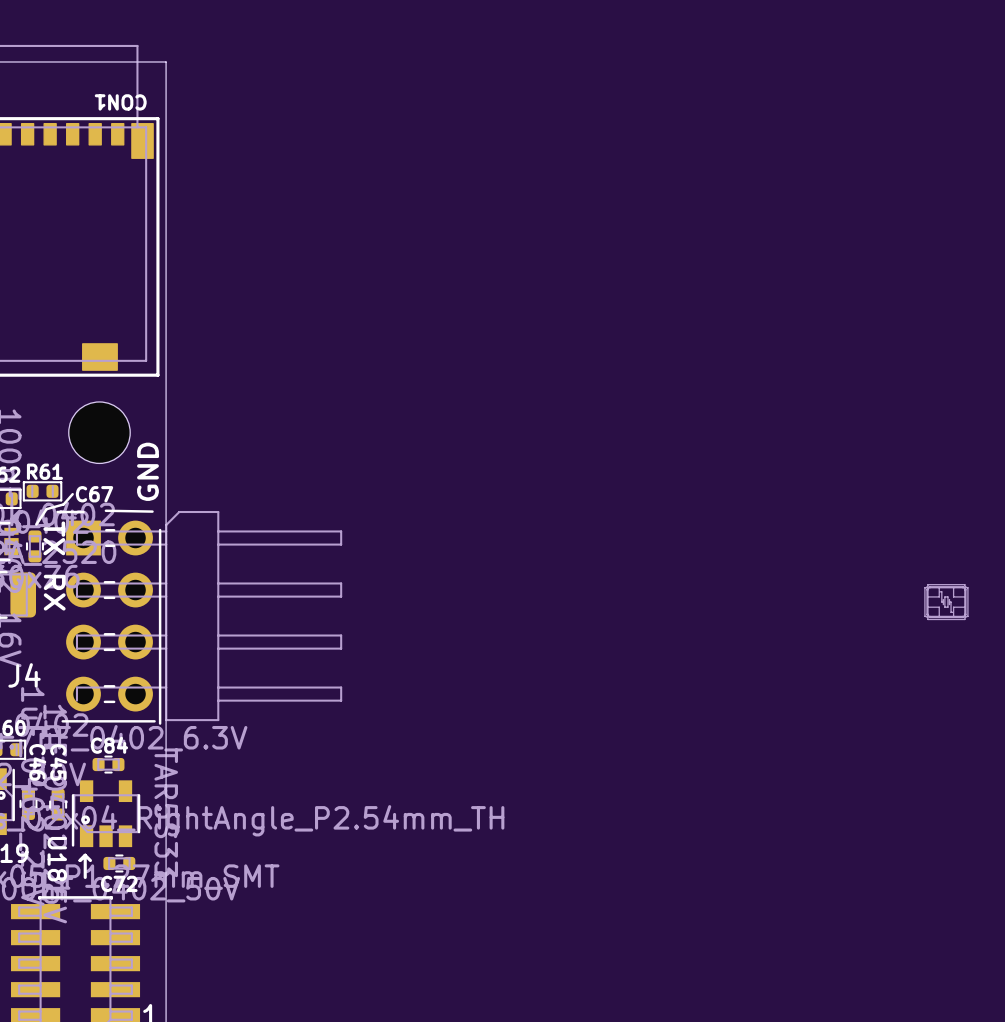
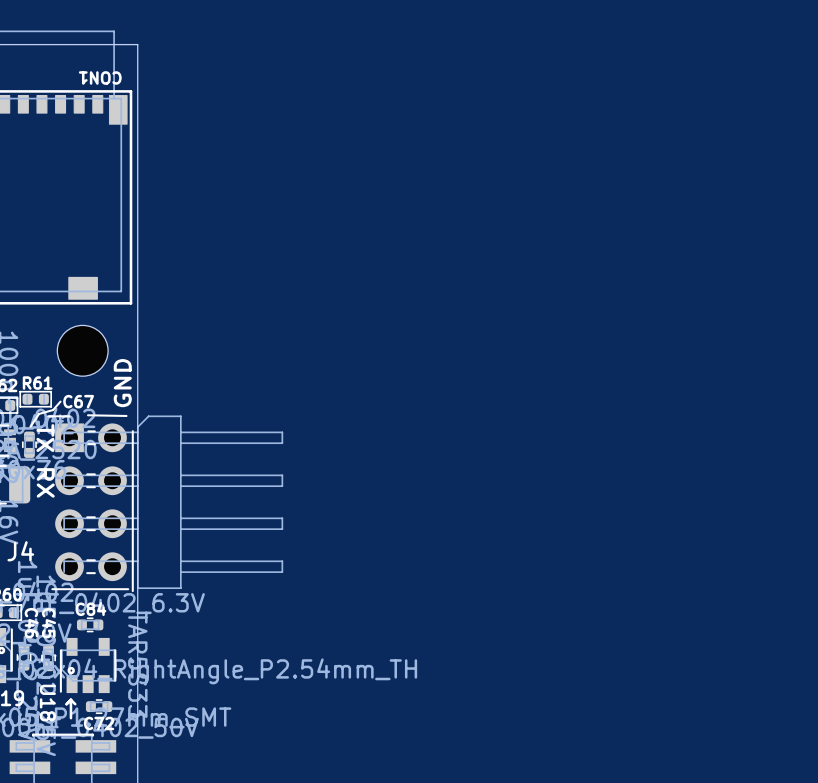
part: (946, 602) -> none

